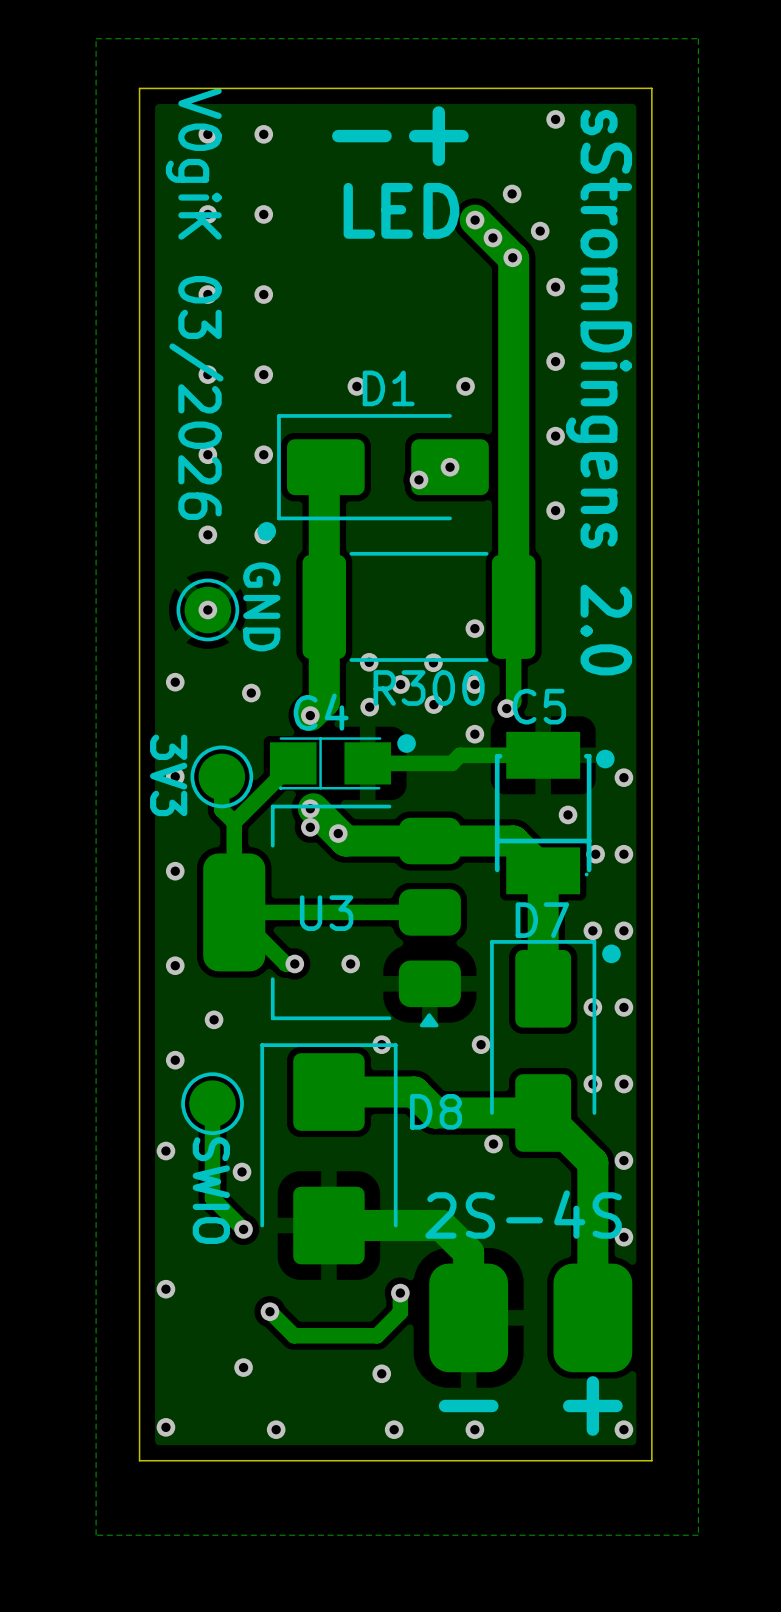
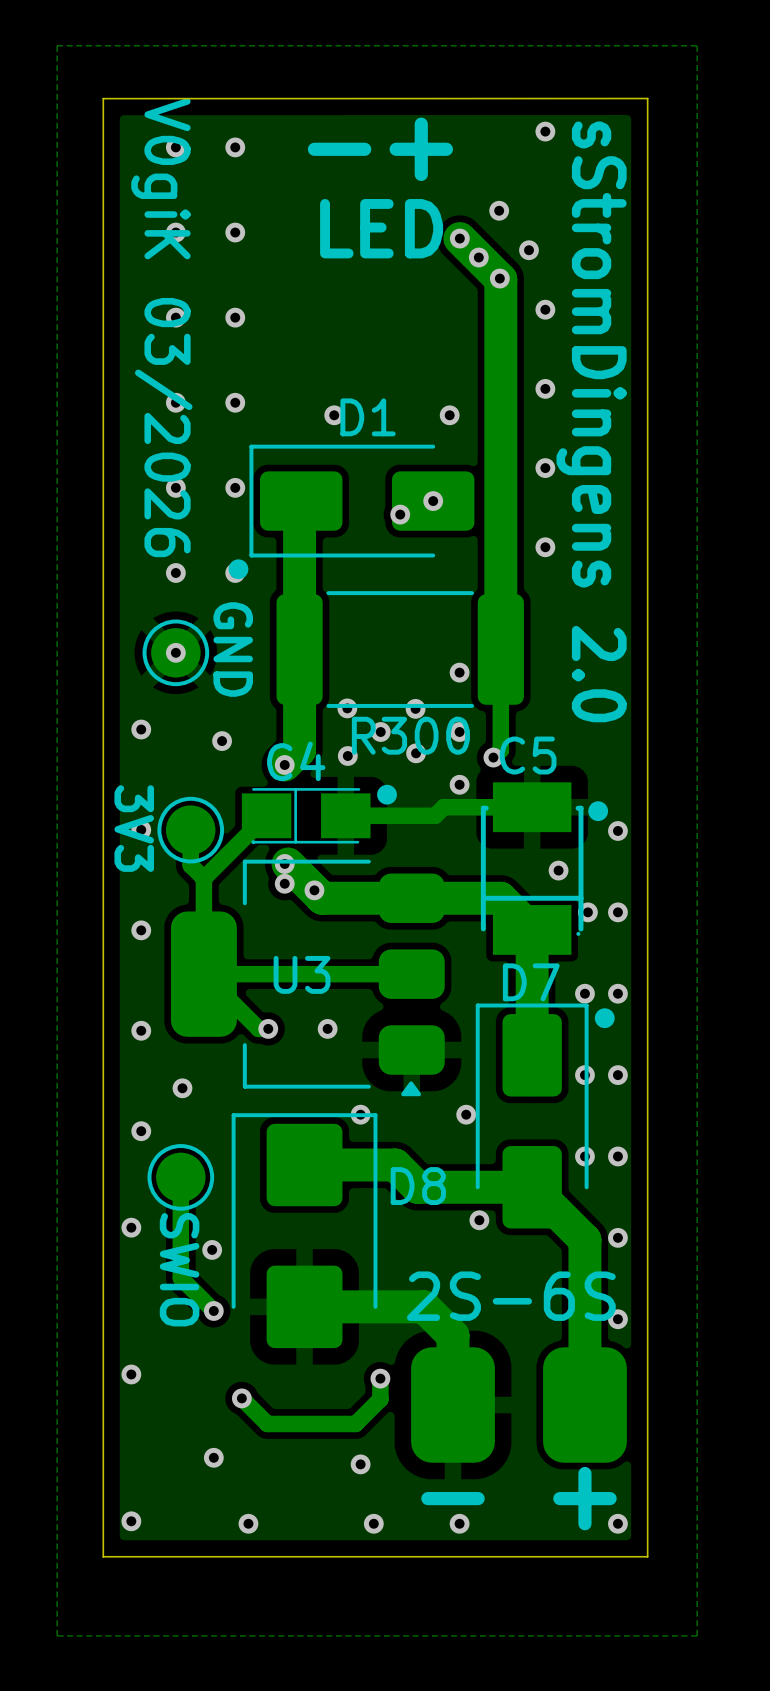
text: 2S-4S (523, 1214) -> 2S-6S (511, 1296)

